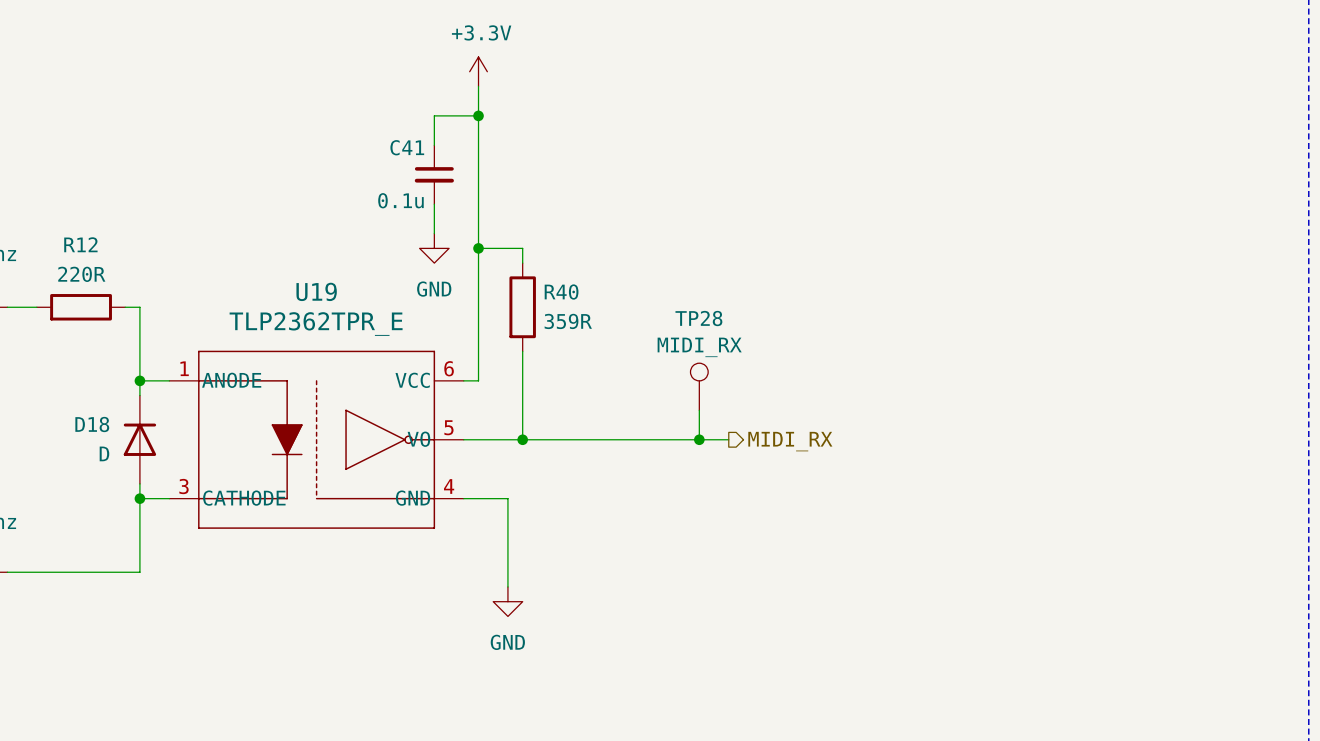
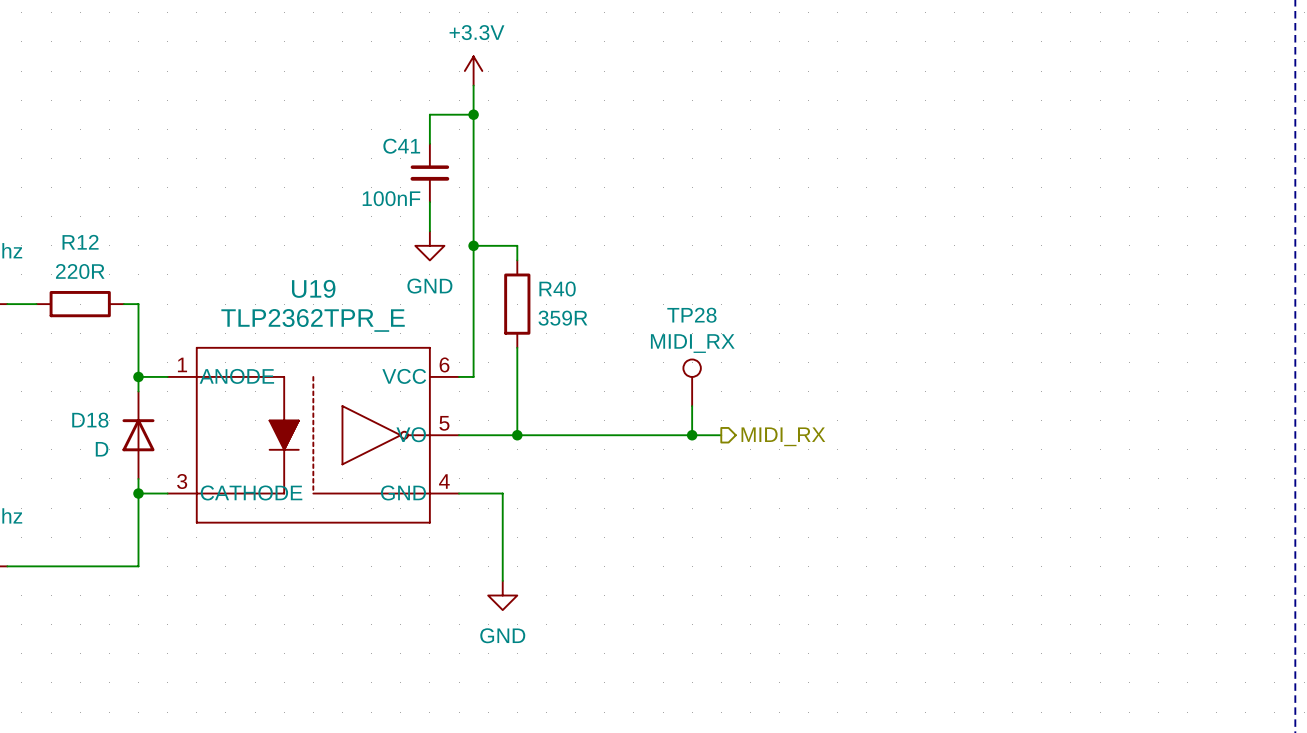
C41 value: 0.1u (400, 200) -> 100nF (391, 198)

